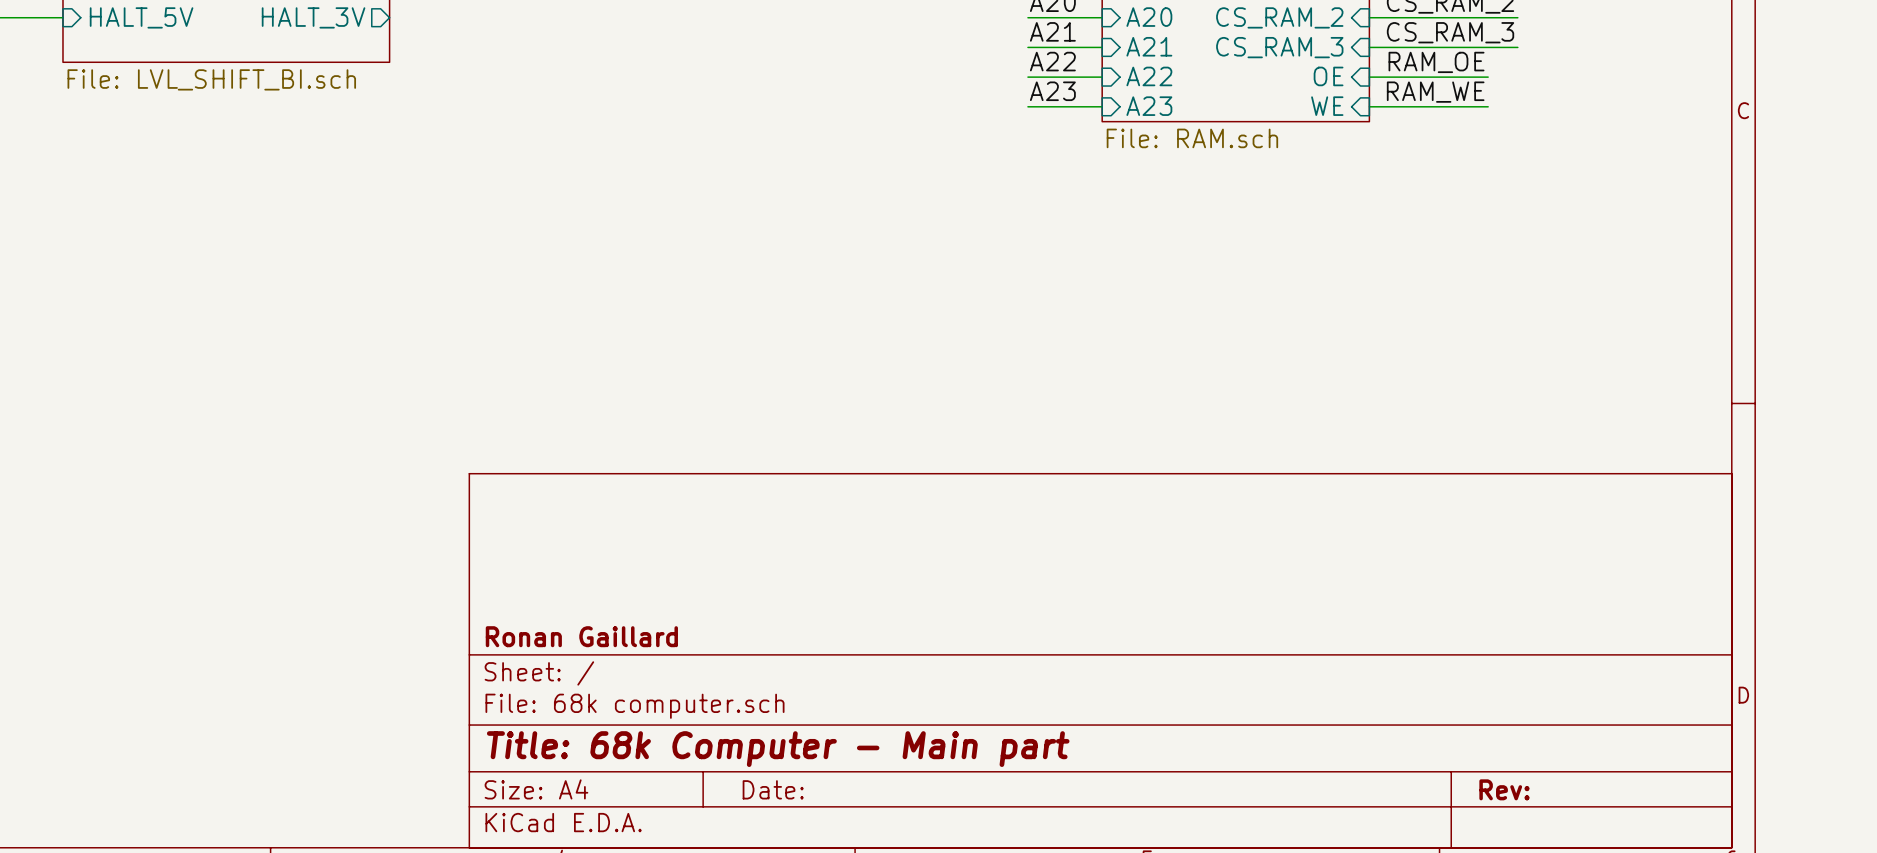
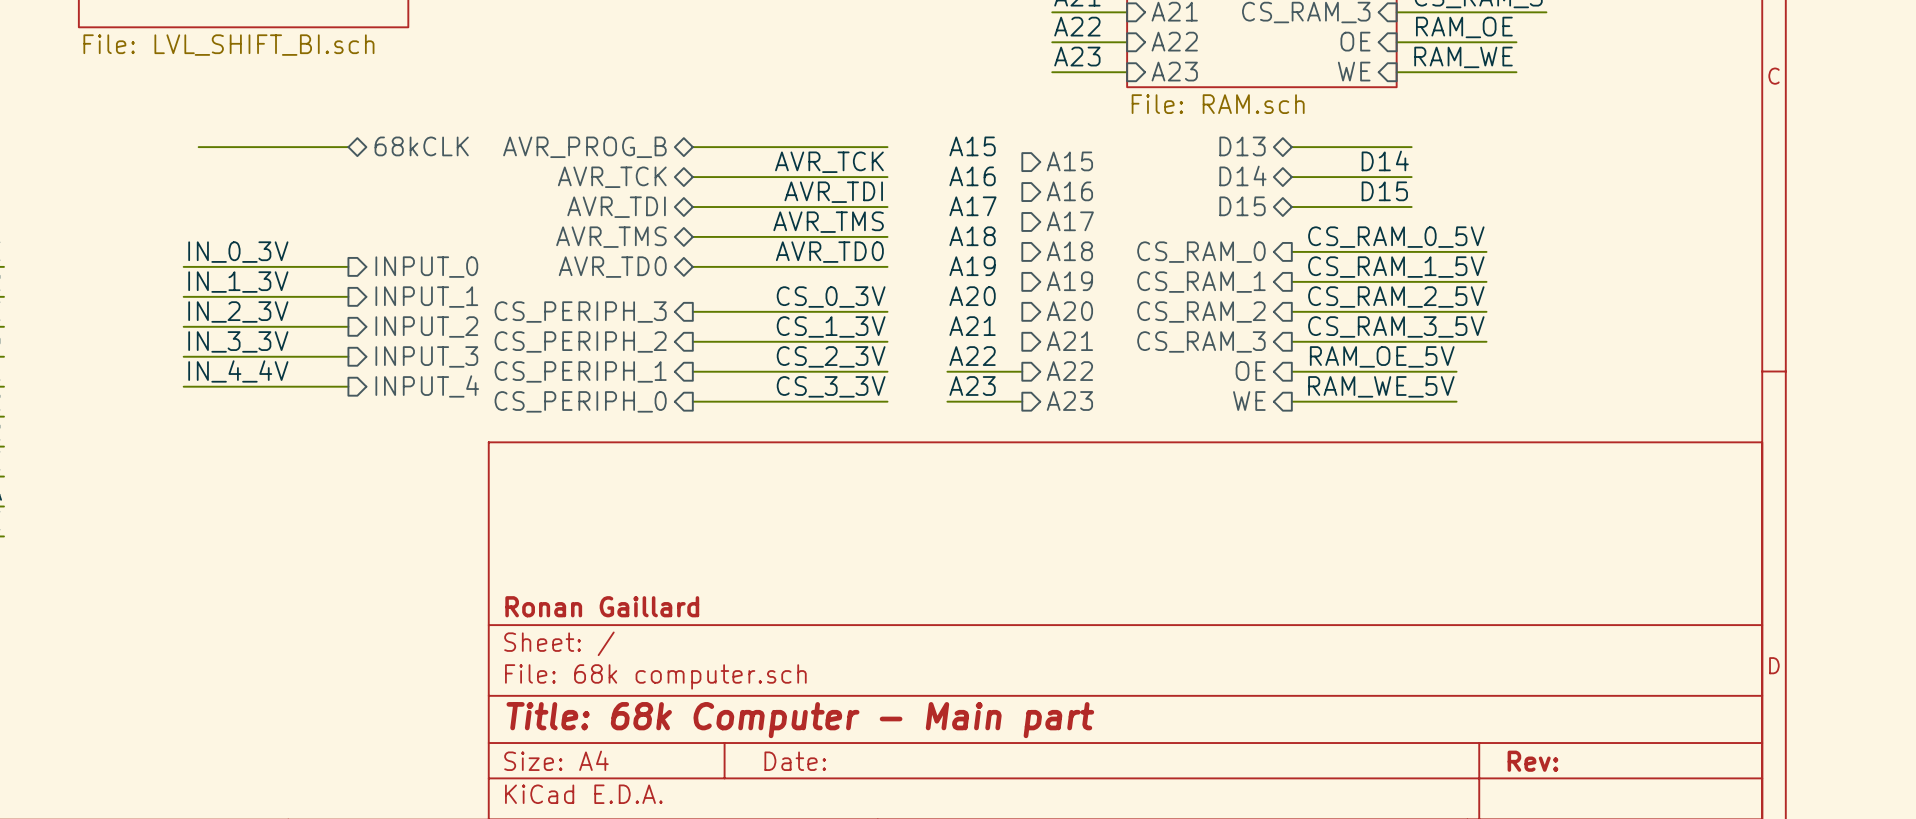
sheet pin: none -> 68kCLK (421, 146)
label: none -> A15 (972, 146)
sheet pin: none -> D13 (1242, 146)
wire: none -> (198, 147) (348, 147)
sheet pin: none -> AVR_PROG_B (584, 147)
wire: none -> (692, 147) (887, 147)
wire: none -> (1291, 147) (1411, 147)
label: none -> D14 (1385, 160)
sheet pin: none -> A15 (1069, 161)
label: none -> AVR_TCK (829, 162)
sheet pin: none -> D14 (1242, 175)
sheet pin: none -> AVR_TCK (612, 177)
wire: none -> (692, 177) (887, 177)
label: none -> A16 (972, 176)
wire: none -> (1291, 177) (1411, 177)
sheet pin: none -> A16 (1069, 191)
label: none -> D15 (1384, 191)
label: none -> AVR_TDI (833, 192)
label: none -> A17 (972, 206)
sheet pin: none -> D15 (1242, 206)
sheet pin: none -> AVR_TDI (616, 207)
wire: none -> (692, 207) (887, 207)
wire: none -> (1291, 207) (1411, 207)
sheet pin: none -> A17 (1070, 221)
label: none -> AVR_TMS (828, 222)
label: none -> A18 (972, 236)
sheet pin: none -> AVR_TMS (611, 237)
wire: none -> (692, 236) (887, 236)
label: none -> CS_RAM_0_5V (1396, 237)
sheet pin: none -> A18 (1069, 251)
wire: none -> (1291, 251) (1486, 251)
label: none -> IN_0_3V (238, 252)
label: none -> AVR_TD0 (829, 252)
sheet pin: none -> CS_RAM_0 (1201, 252)
wire: none -> (183, 266) (348, 266)
sheet pin: none -> INPUT_0 (426, 267)
sheet pin: none -> AVR_TD0 (612, 267)
wire: none -> (692, 266) (887, 266)
label: none -> A19 (972, 266)
label: none -> CS_RAM_1_5V (1396, 267)
sheet pin: none -> A19 (1069, 281)
label: none -> IN_1_3V (238, 282)
sheet pin: none -> CS_RAM_1 (1201, 282)
wire: none -> (1291, 281) (1486, 281)
label: none -> A20 (972, 296)
wire: none -> (183, 296) (348, 296)
sheet pin: none -> INPUT_1 (426, 297)
label: none -> CS_0_3V (831, 297)
label: none -> CS_RAM_2_5V (1396, 297)
sheet pin: none -> A20 (1069, 311)
label: none -> IN_2_3V (238, 311)
sheet pin: none -> CS_PERIPH_3 (580, 312)
wire: none -> (692, 311) (887, 311)
sheet pin: none -> CS_RAM_2 (1201, 312)
wire: none -> (1291, 311) (1486, 311)
label: none -> A21 (972, 326)
wire: none -> (183, 326) (348, 326)
sheet pin: none -> INPUT_2 (426, 326)
label: none -> CS_1_3V (831, 326)
label: none -> CS_RAM_3_5V (1396, 326)
sheet pin: none -> A21 (1069, 341)
label: none -> IN_3_3V (238, 341)
sheet pin: none -> CS_PERIPH_2 (580, 341)
wire: none -> (692, 341) (887, 341)
sheet pin: none -> CS_RAM_3 (1201, 341)
wire: none -> (1291, 341) (1486, 341)
wire: none -> (183, 356) (348, 356)
label: none -> A22 (972, 356)
sheet pin: none -> INPUT_3 (426, 356)
label: none -> CS_2_3V (831, 356)
label: none -> RAM_OE_5V (1382, 356)
label: none -> IN_4_4V (238, 371)
sheet pin: none -> CS_PERIPH_1 (580, 371)
wire: none -> (692, 371) (887, 371)
wire: none -> (947, 371) (1022, 371)
sheet pin: none -> A22 (1069, 371)
sheet pin: none -> OE (1250, 371)
wire: none -> (1291, 371) (1456, 371)
label: none -> A23 (972, 386)
wire: none -> (183, 386) (348, 386)
sheet pin: none -> INPUT_4 (427, 386)
label: none -> CS_3_3V (831, 386)
label: none -> RAM_WE_5V (1381, 386)
sheet pin: none -> A23 (1069, 401)
sheet pin: none -> WE (1249, 401)
sheet pin: none -> CS_PERIPH_0 (580, 401)
wire: none -> (692, 401) (887, 401)
wire: none -> (947, 401) (1022, 401)
wire: none -> (1291, 401) (1456, 401)

